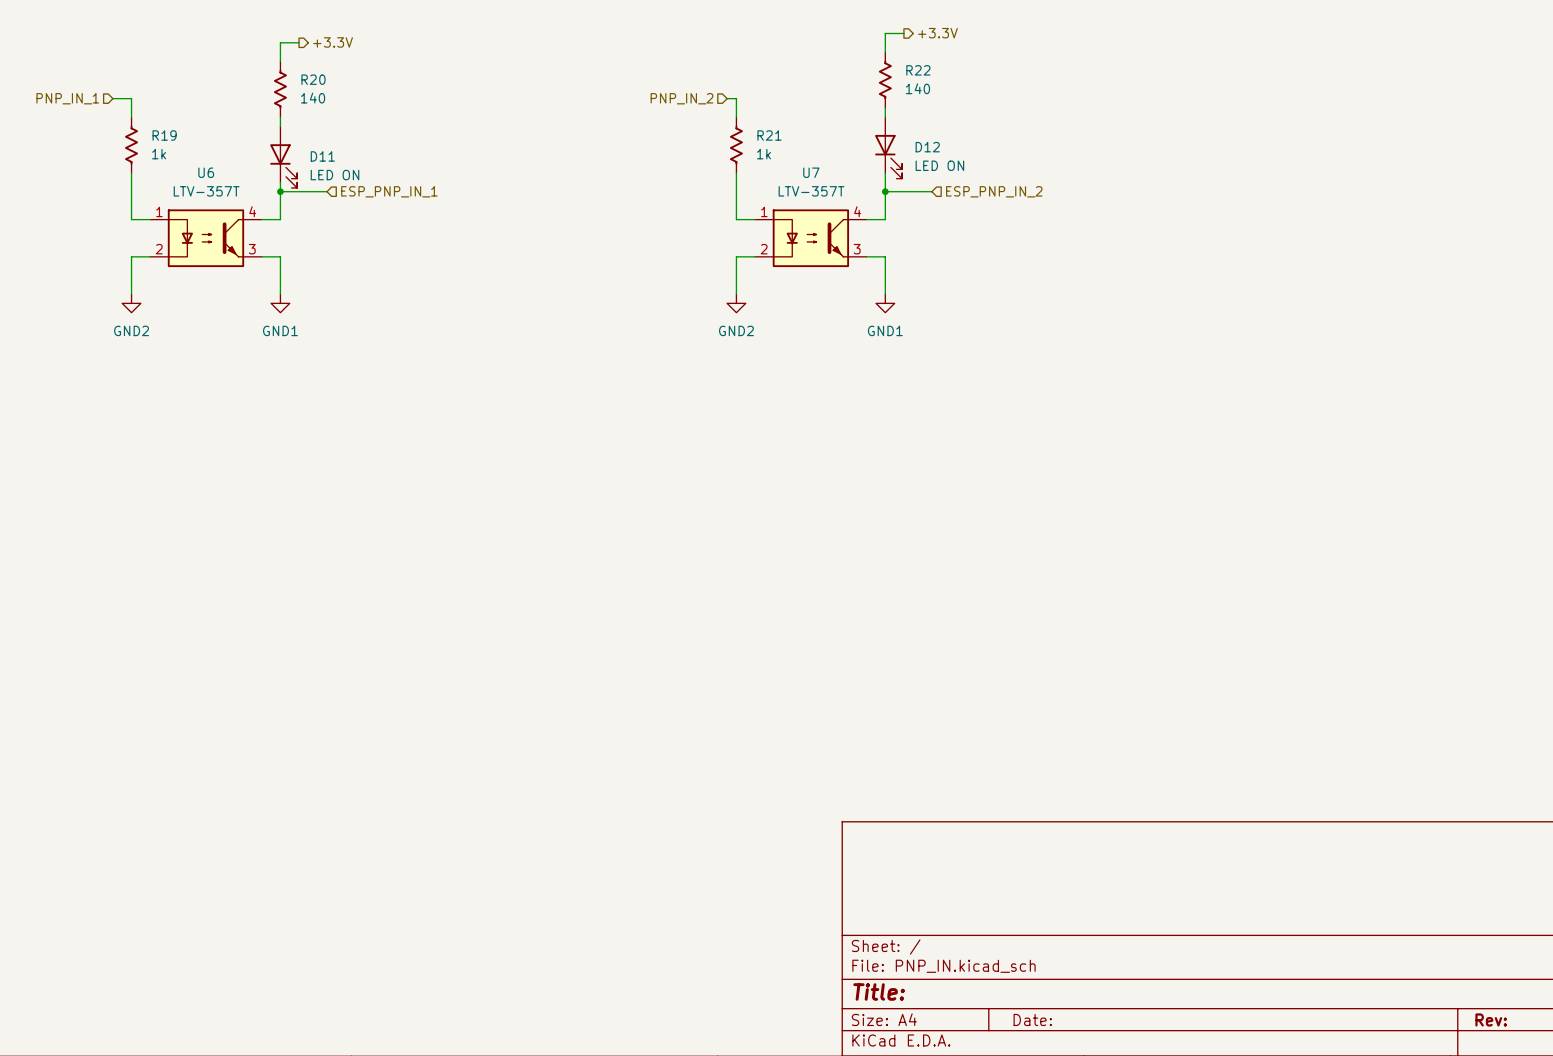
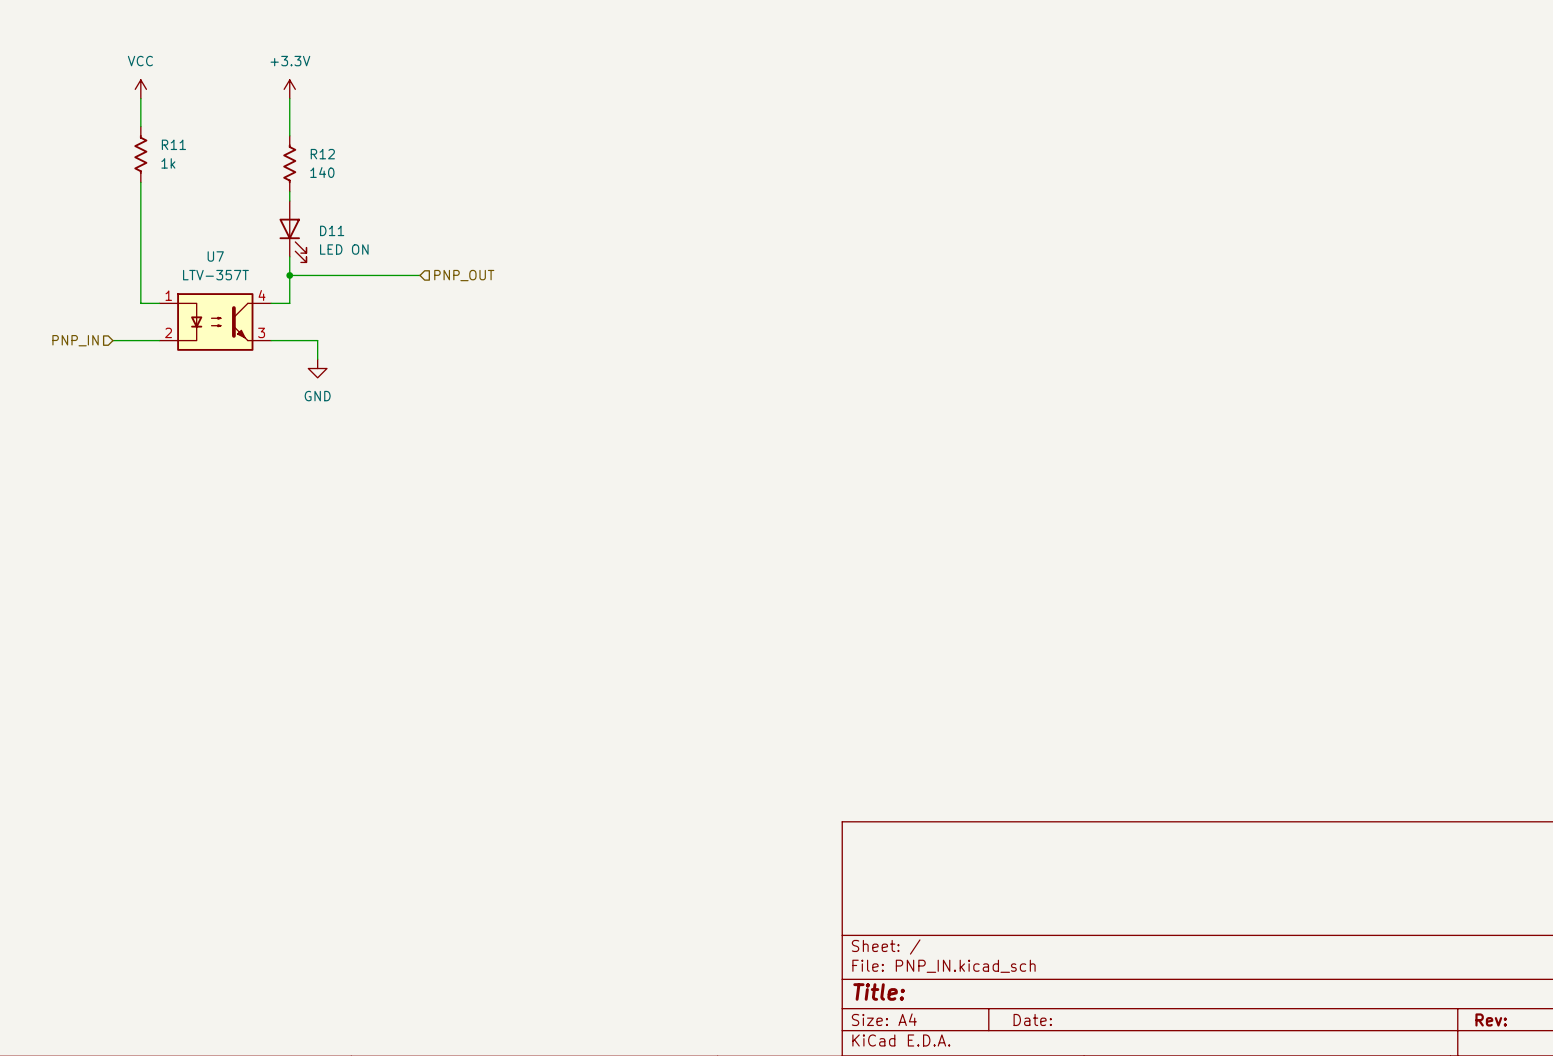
wire: (903, 33) (885, 33) (885, 52) -> none
hierarchical label: +3.3V (937, 33) -> none
wire: (299, 42) (280, 42) (280, 61) -> none
hierarchical label: +3.3V (333, 42) -> none
R22: 140 (885, 80) -> none
power symbol: none -> VCC (140, 89)
R20: 140 (280, 89) -> none
power symbol: none -> +3.3V (289, 89)
hierarchical label: PNP_IN_1 (67, 98) -> none
wire: (112, 98) (131, 98) (131, 117) -> none
wire: none -> (140, 98) (140, 126)
wire: none -> (289, 98) (289, 135)
hierarchical label: PNP_IN_2 (682, 98) -> none
wire: (727, 98) (736, 98) (736, 117) -> none
wire: (885, 107) (885, 117) -> none
wire: (280, 117) (280, 126) -> (289, 191) (289, 201)
R19: 1k (131, 145) -> none
R21: 1k (736, 145) -> none
D12: LED ON (888, 147) -> none
R11: none -> 1k (140, 154)
D11 position: (283, 157) -> (292, 231)
R12: none -> 140 (289, 163)
wire: (131, 173) (131, 219) (150, 219) -> none
wire: (736, 173) (736, 219) (755, 219) -> none
wire: (885, 173) (885, 219) (866, 219) -> none
wire: none -> (140, 182) (140, 303) (159, 303)
wire: (280, 182) (280, 219) (261, 219) -> none
wire: (280, 191) (326, 191) -> none
junction: (280, 191) -> none
hierarchical label: ESP_PNP_IN_1 (389, 191) -> none
wire: (885, 191) (931, 191) -> none
junction: (885, 191) -> none
hierarchical label: ESP_PNP_IN_2 (994, 191) -> none
U6: LTV-357T (205, 238) -> none
U7 position: (810, 238) -> (215, 321)
wire: (150, 256) (131, 256) (131, 294) -> none
wire: (261, 256) (280, 256) (280, 294) -> none
wire: none -> (289, 256) (289, 303) (271, 303)
wire: (755, 256) (736, 256) (736, 294) -> none
wire: (866, 256) (885, 256) (885, 294) -> none
wire: none -> (289, 275) (420, 275)
junction: none -> (289, 275)
hierarchical label: none -> PNP_OUT (464, 275)
power symbol: GND2 (131, 303) -> none
power symbol: GND1 (280, 303) -> none
power symbol: GND2 (736, 303) -> none
power symbol: GND1 (885, 303) -> none
hierarchical label: none -> PNP_IN (75, 340)
wire: none -> (112, 340) (159, 340)
wire: none -> (271, 340) (317, 340) (317, 359)
power symbol: none -> GND (317, 368)

